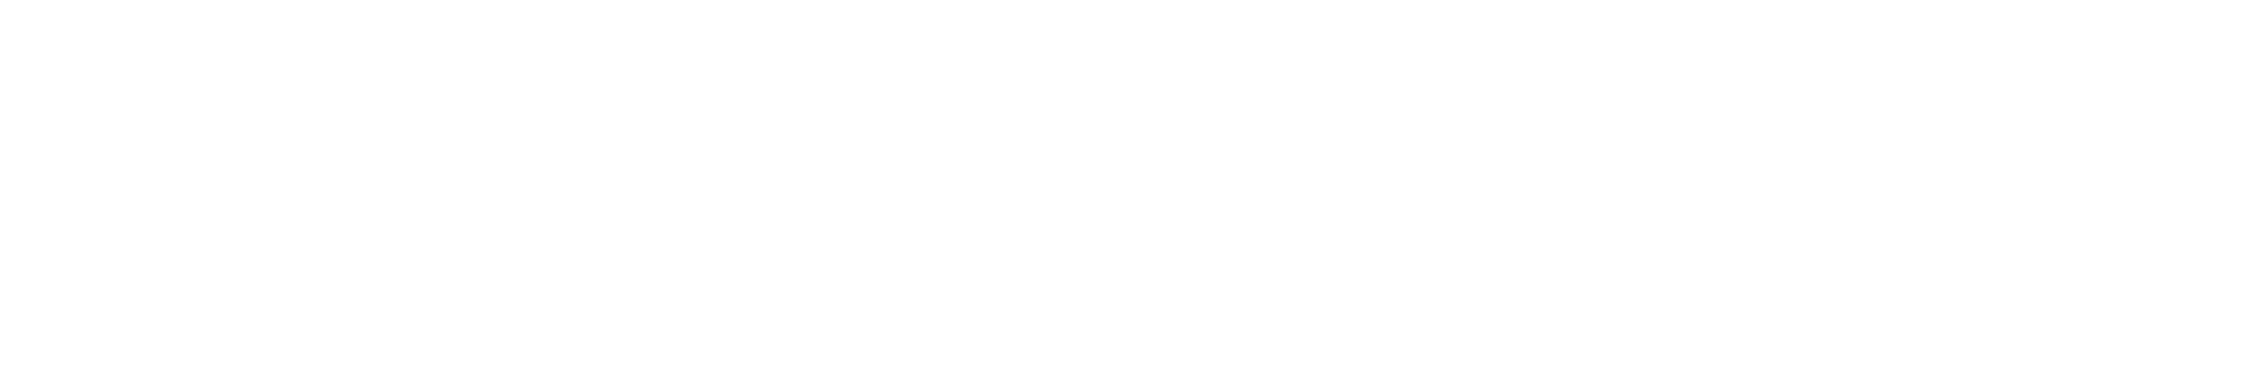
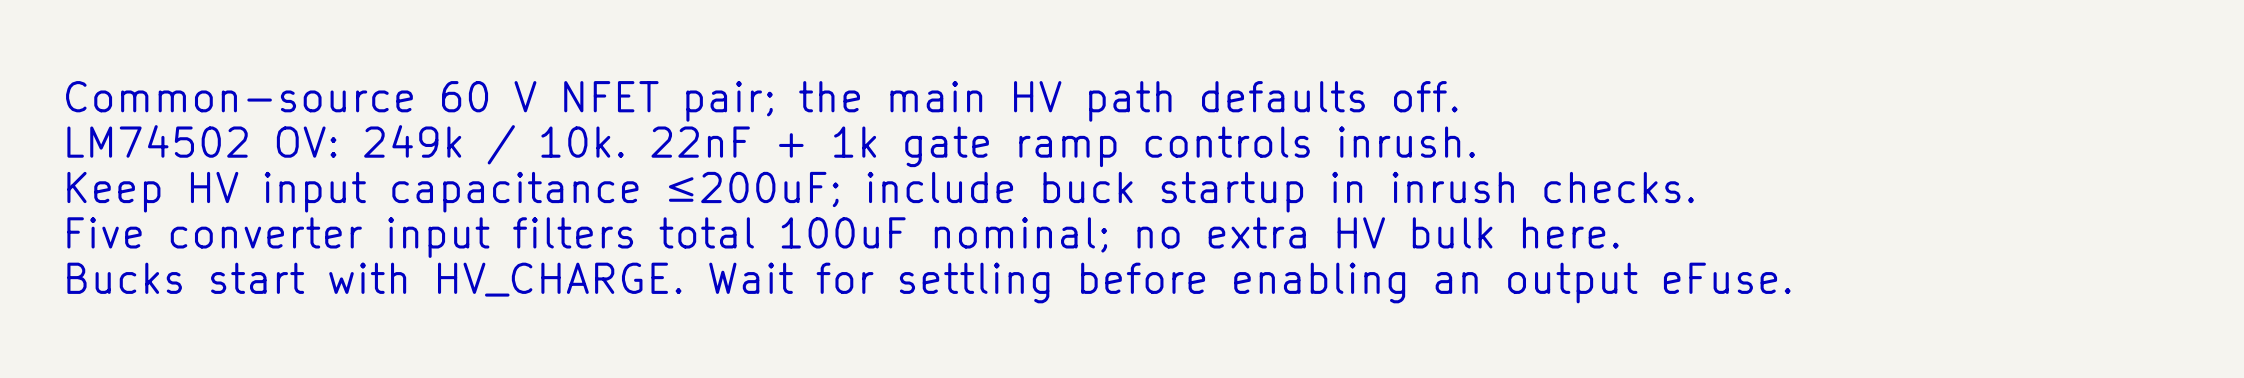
text: none -> Common-source 60 V NFET pair; the main HV path defaults off. (761, 101)
text: none -> LM74502 OV: 249k / 10k. 22nF + 1k gate ramp controls inrush. (771, 146)
text: none -> Keep HV input capacitance ≤200uF; include buck startup in inrush checks. (880, 192)
text: none -> Five converter input filters total 100uF nominal; no extra HV bulk here. (843, 237)
text: none -> Bucks start with HV_CHARGE. Wait for settling before enabling an output eFuse. (928, 282)

